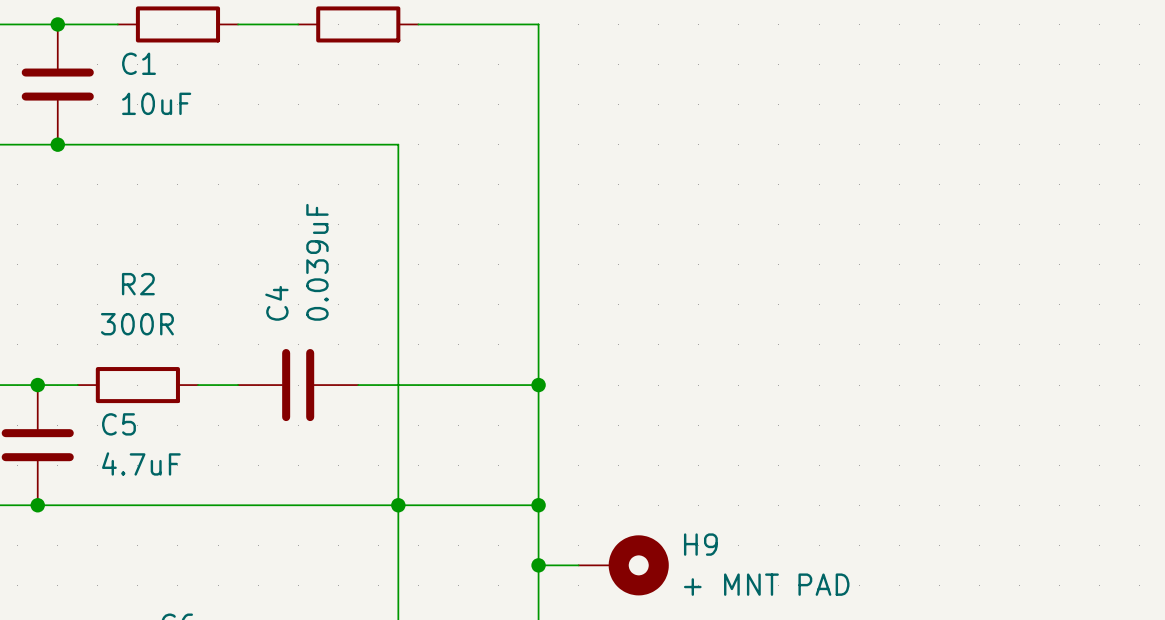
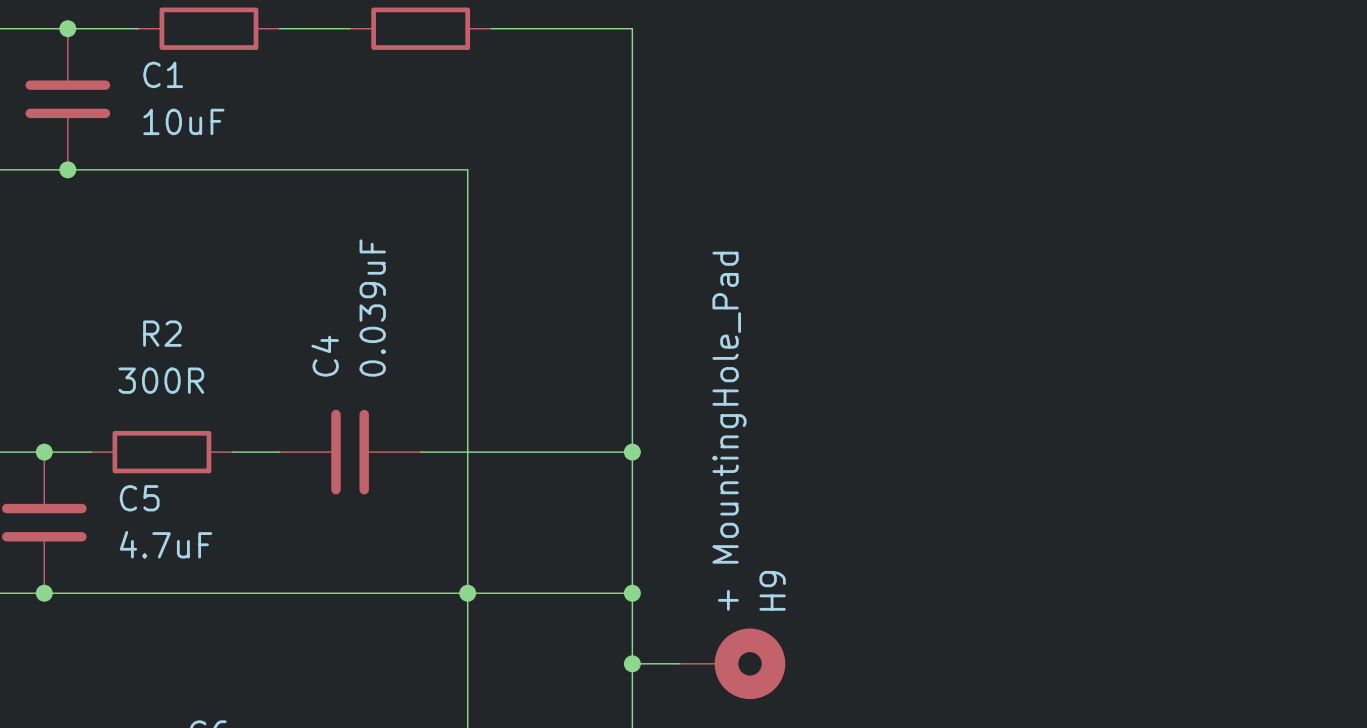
H9 name rotation: 0° (700, 544) -> 90° counterclockwise (772, 590)
H9 name position: H9 (700, 544) -> H9 (772, 590)
H9 value: + MNT PAD (766, 584) -> + MountingHole_Pad (729, 431)

